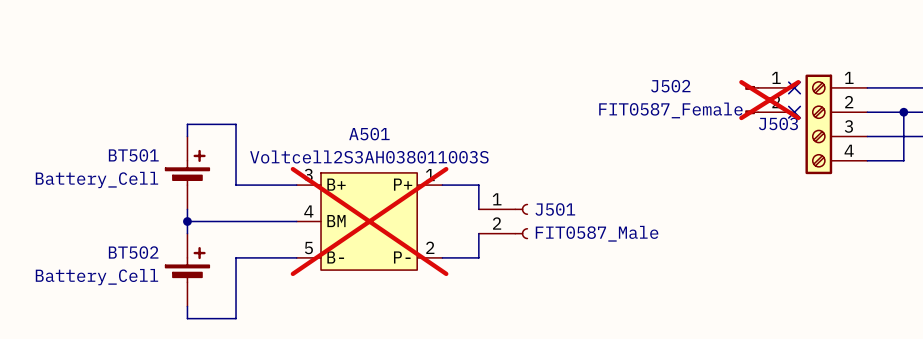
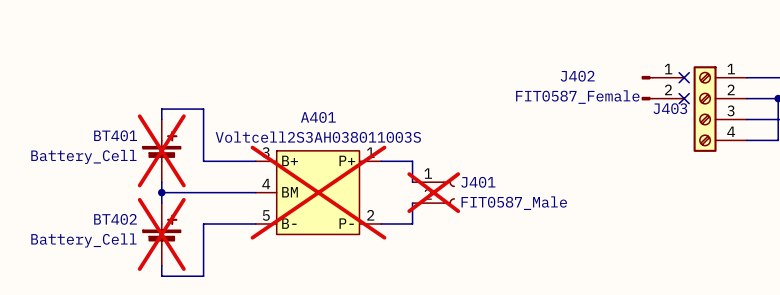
J502 name: J502 (670, 86) -> J402 (577, 76)
J502 do-not-place cross: (769, 100) -> none
J503 name: J503 (778, 123) -> J403 (670, 108)
A501 name: A501 (369, 134) -> A401 (318, 117)
BT501 name: BT501 (133, 155) -> BT401 (115, 135)
BT501 do-not-place cross: none -> (161, 150)
J501 name: J501 (555, 209) -> J401 (478, 182)
J501 do-not-place cross: none -> (433, 192)
BT502 name: BT502 (133, 252) -> BT402 (115, 219)
BT502 do-not-place cross: none -> (161, 234)

